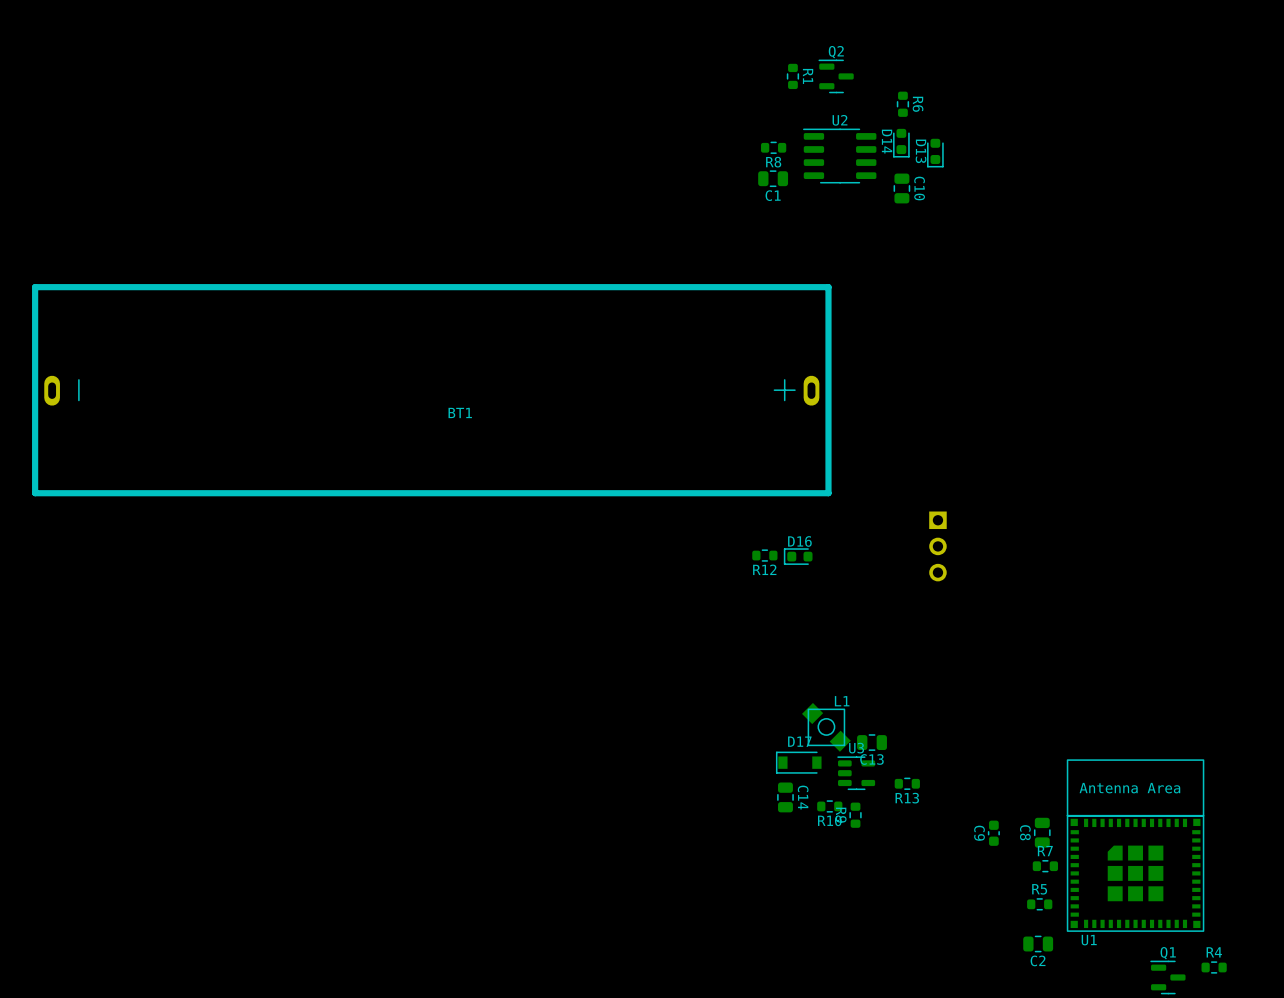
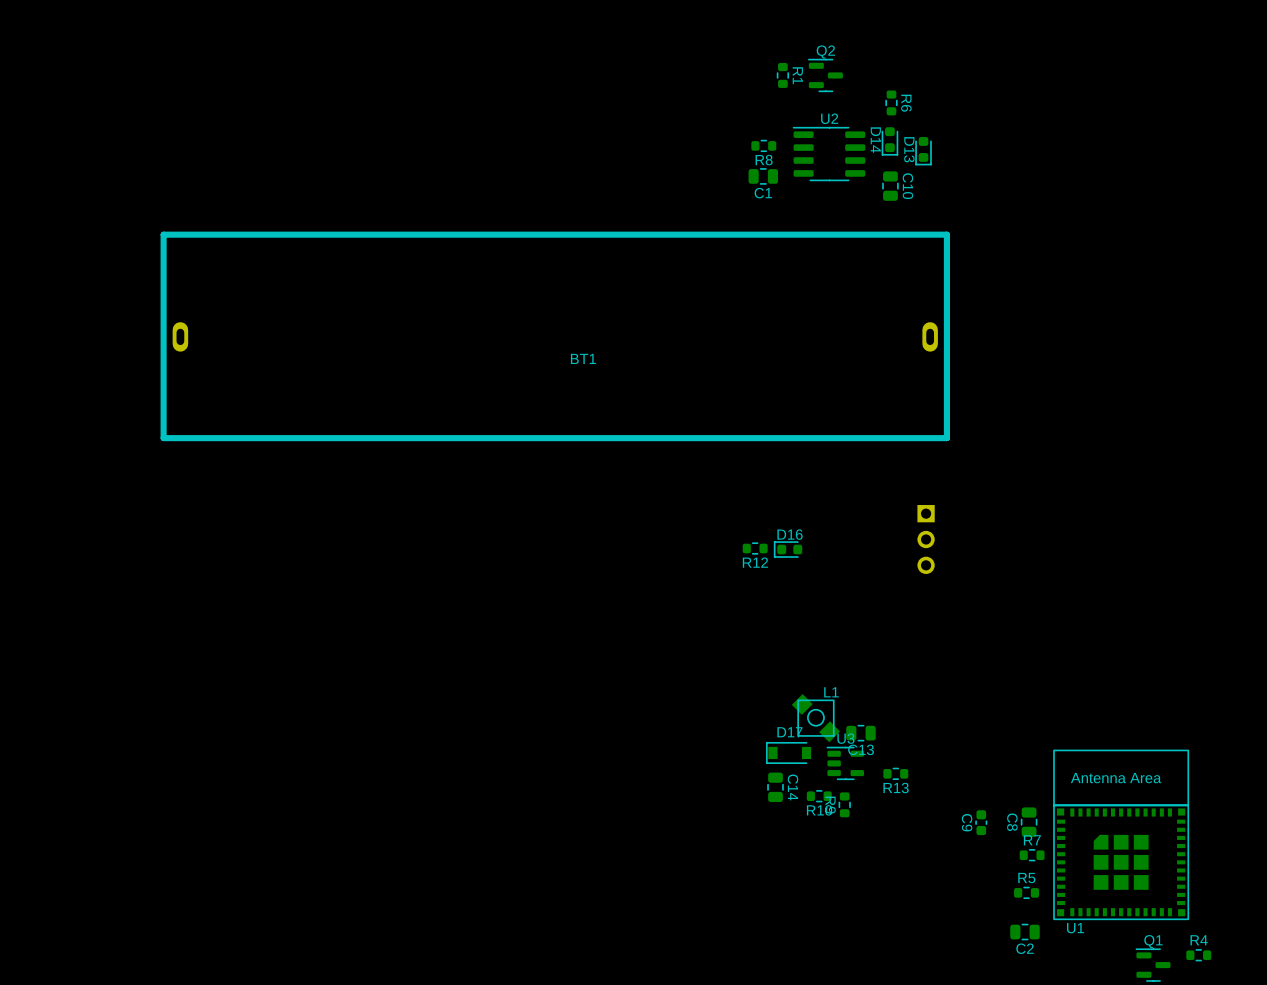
BT1 footprint: [32, 284, 832, 497] -> [160, 231, 950, 442]

